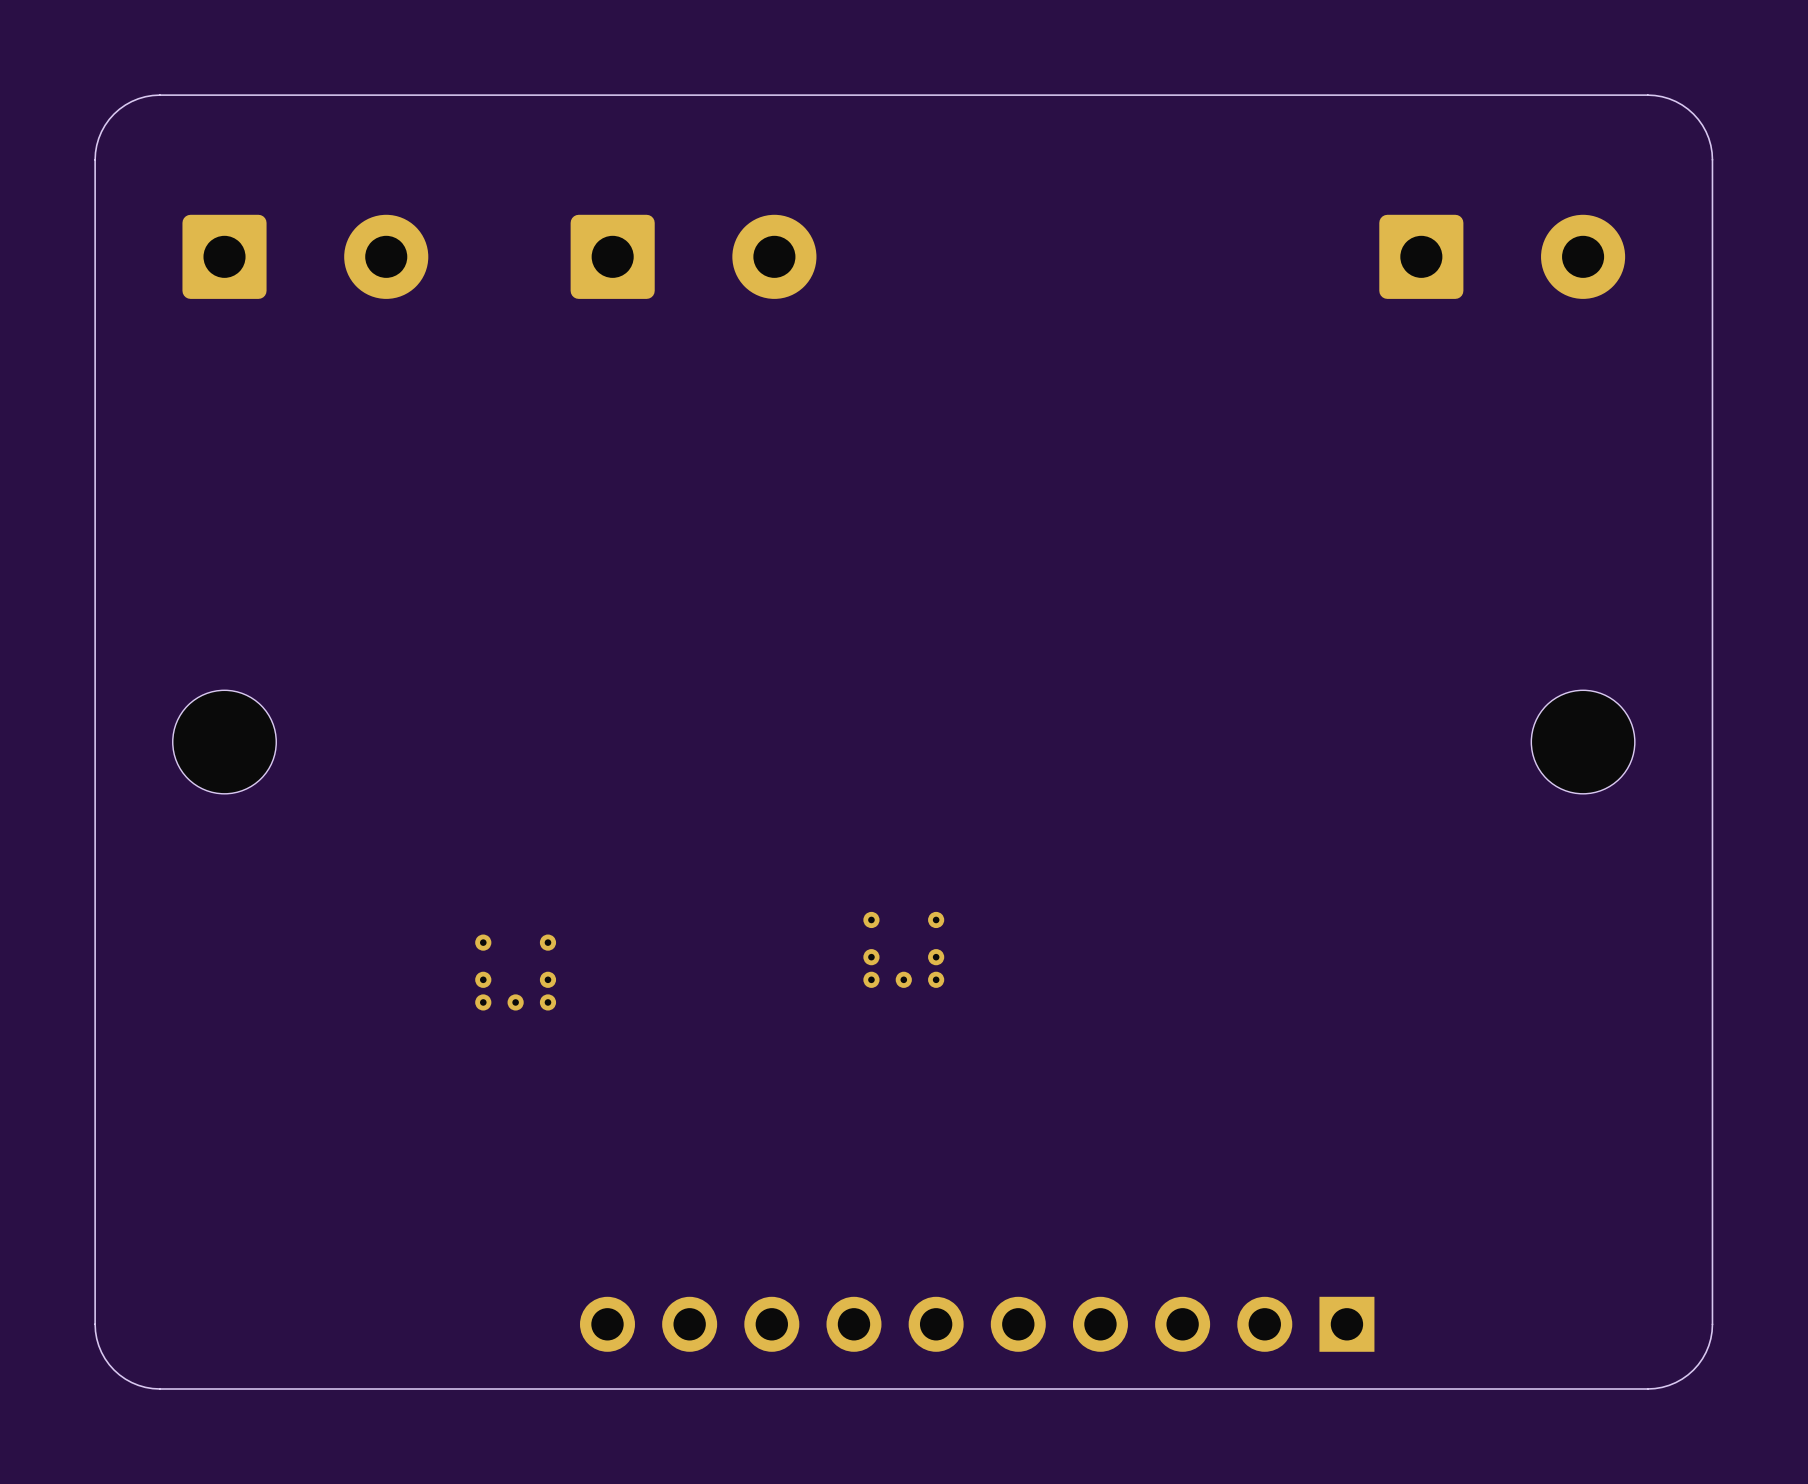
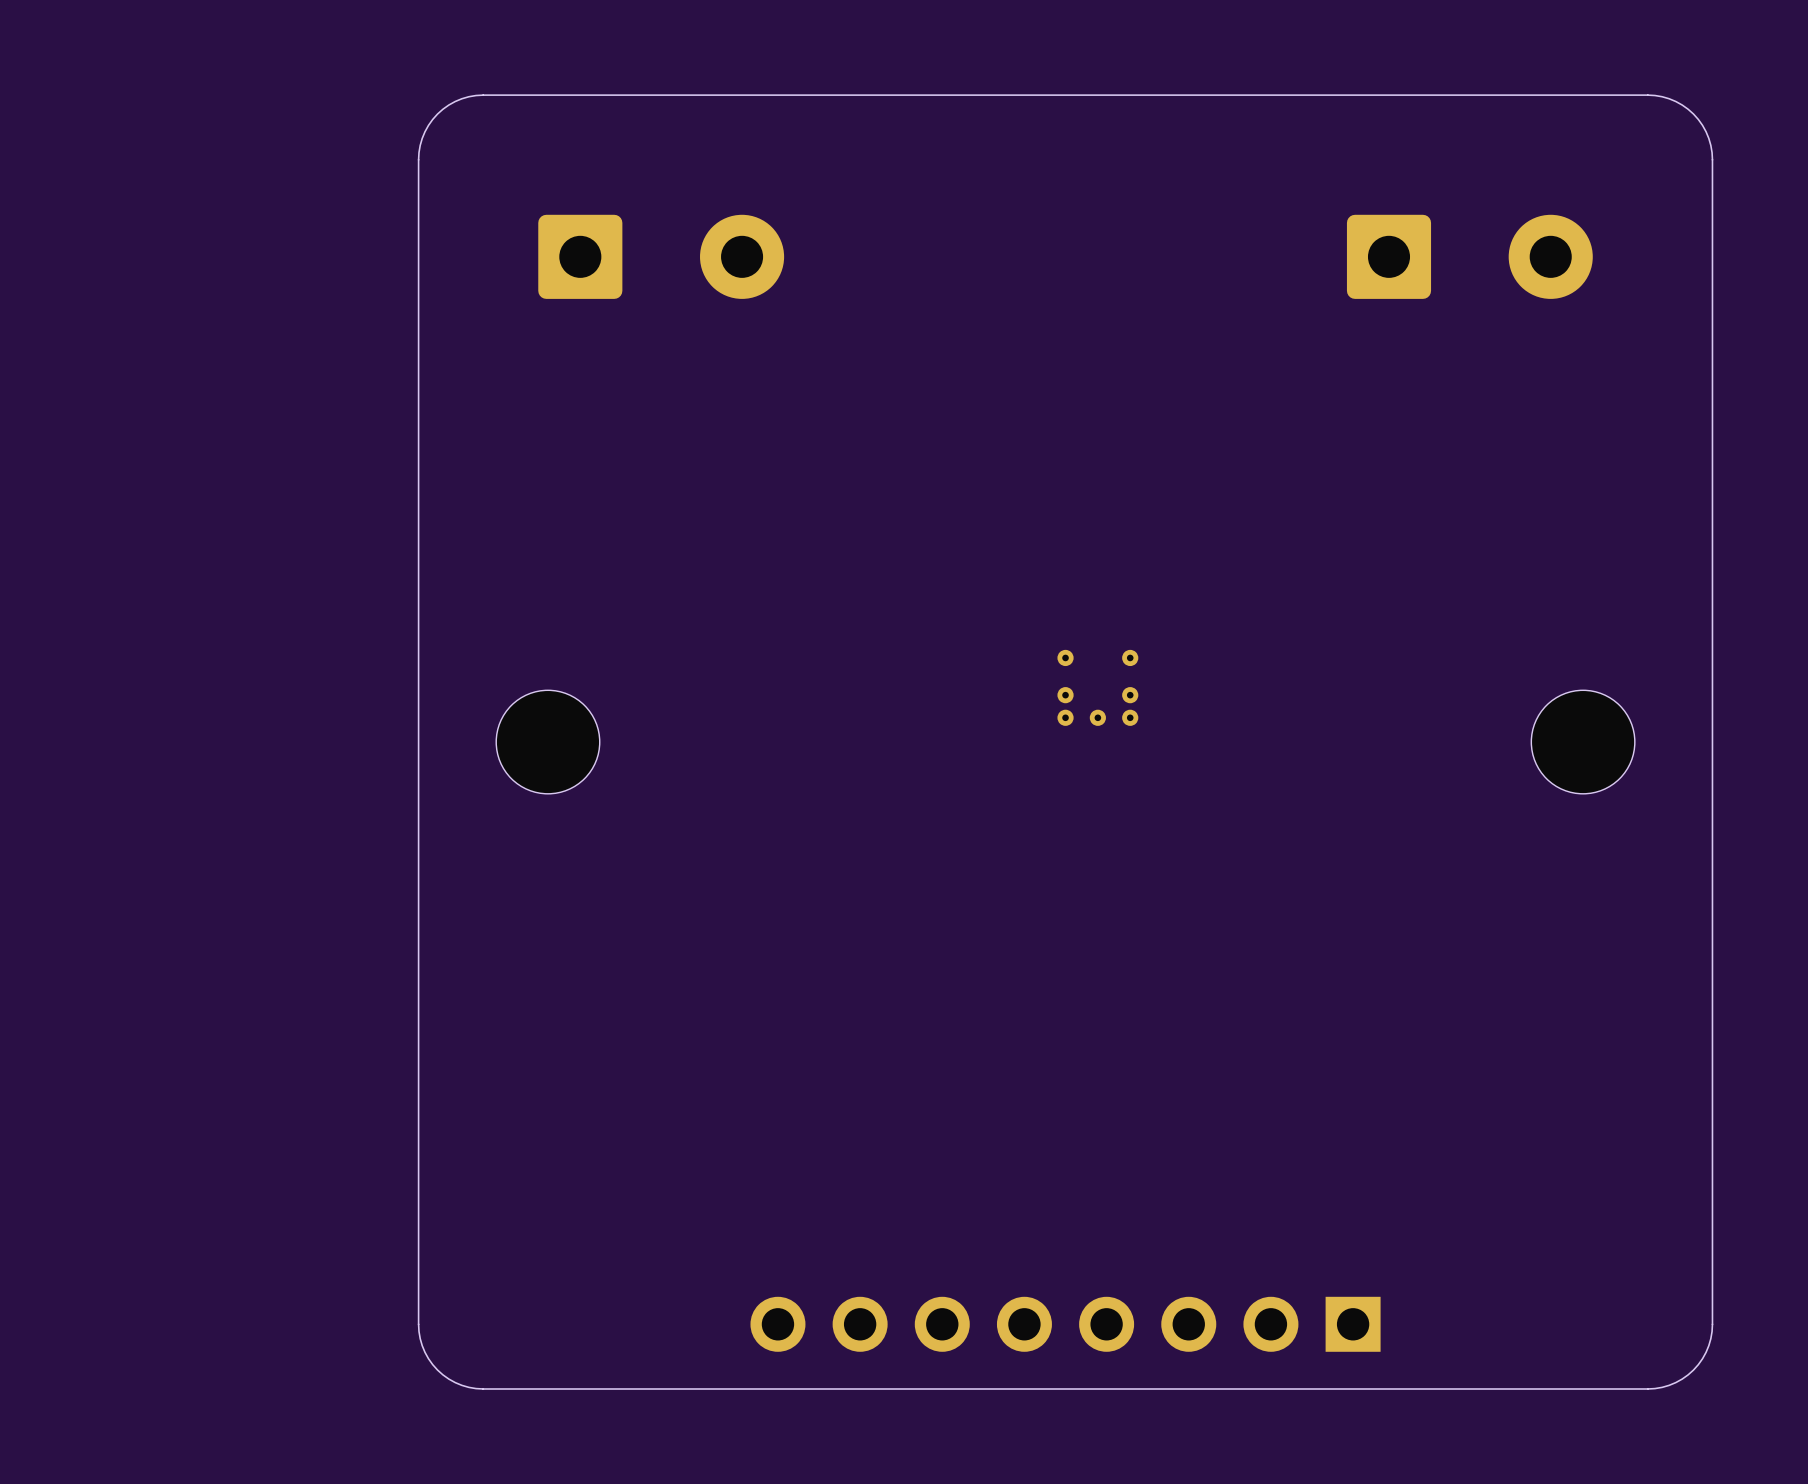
board edge: (483, 95) (152, 95) (131, 101) (114, 114) (101, 131) (96, 145) (95, 159) (95, 1324) (98, 1345) (105, 1358) (119, 1374) (131, 1382) (152, 1388) (483, 1389) -> (483, 95) (468, 96) (455, 101) (437, 114) (428, 125) (422, 138) (418, 159) (418, 1324) (422, 1345) (428, 1358) (437, 1370) (448, 1379) (461, 1385) (483, 1389)
part: (305, 256) -> none
part position: (693, 256) -> (661, 256)
part position: (1502, 256) -> (1469, 256)
part: none -> (1097, 687)
part position: (224, 742) -> (547, 742)
part: (903, 949) -> none
part: (515, 972) -> none
part: (977, 1324) -> none
part: none -> (1065, 1324)

